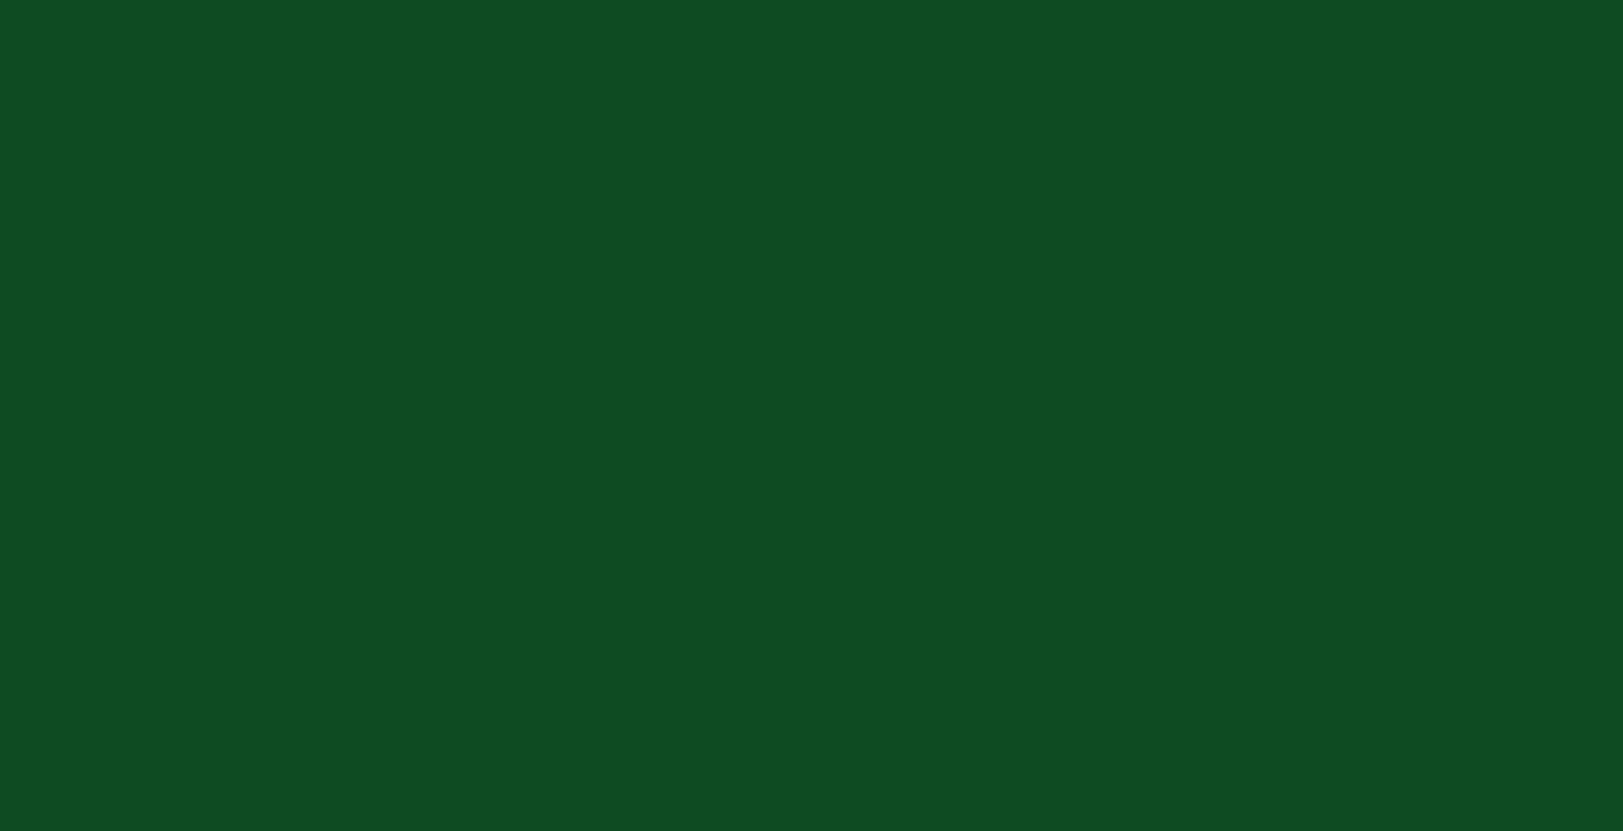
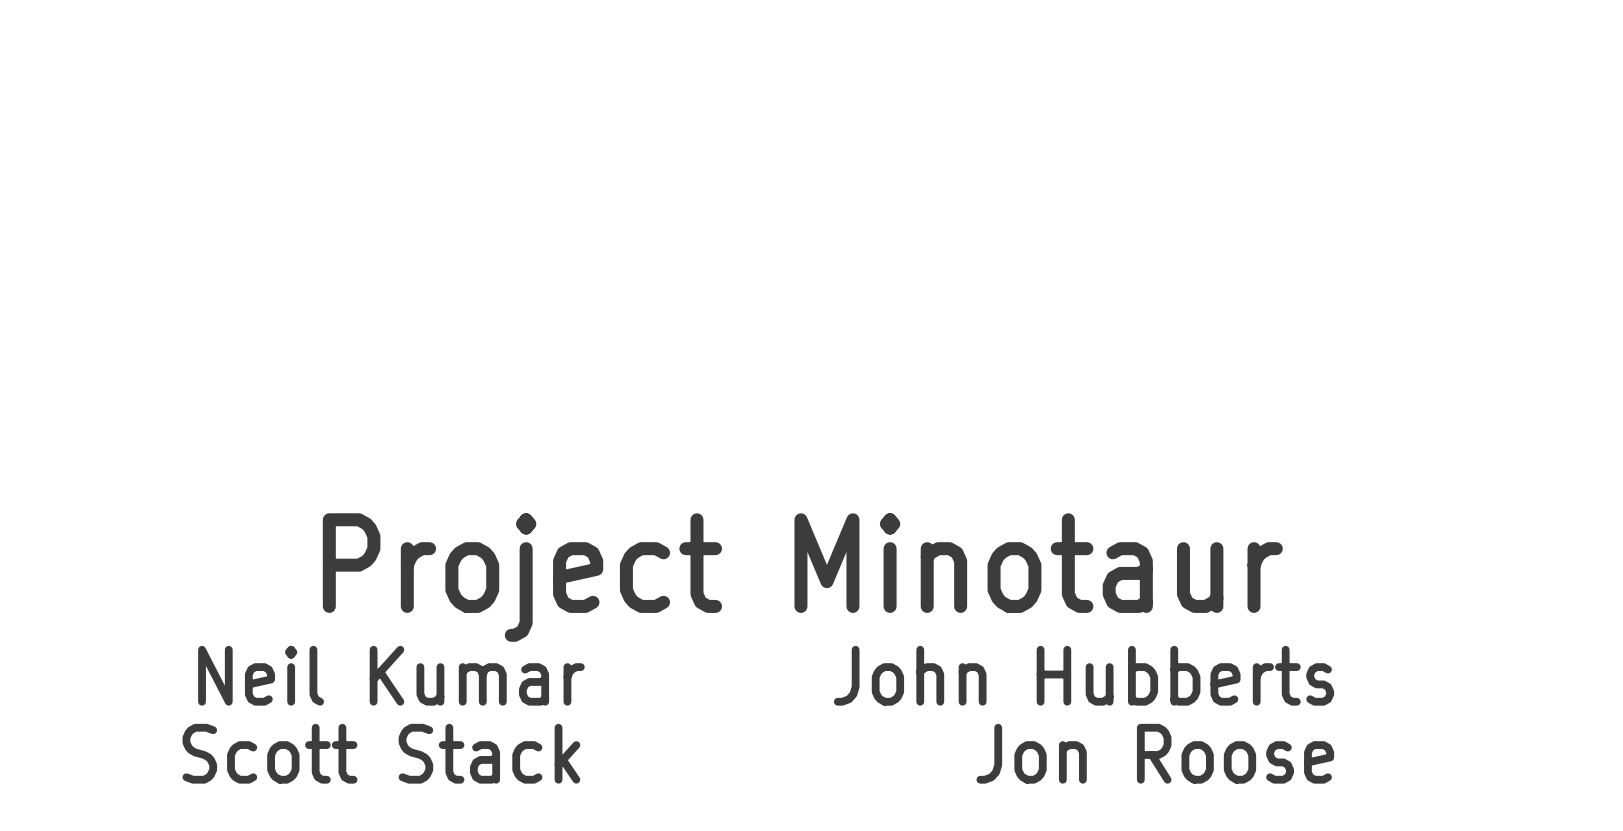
text: none -> Project Minotaur (802, 577)
text: none -> Neil Kumar (391, 675)
text: none -> John Hubberts (1084, 675)
text: none -> Scott Stack (381, 753)
text: none -> Jon Roose (1155, 753)

